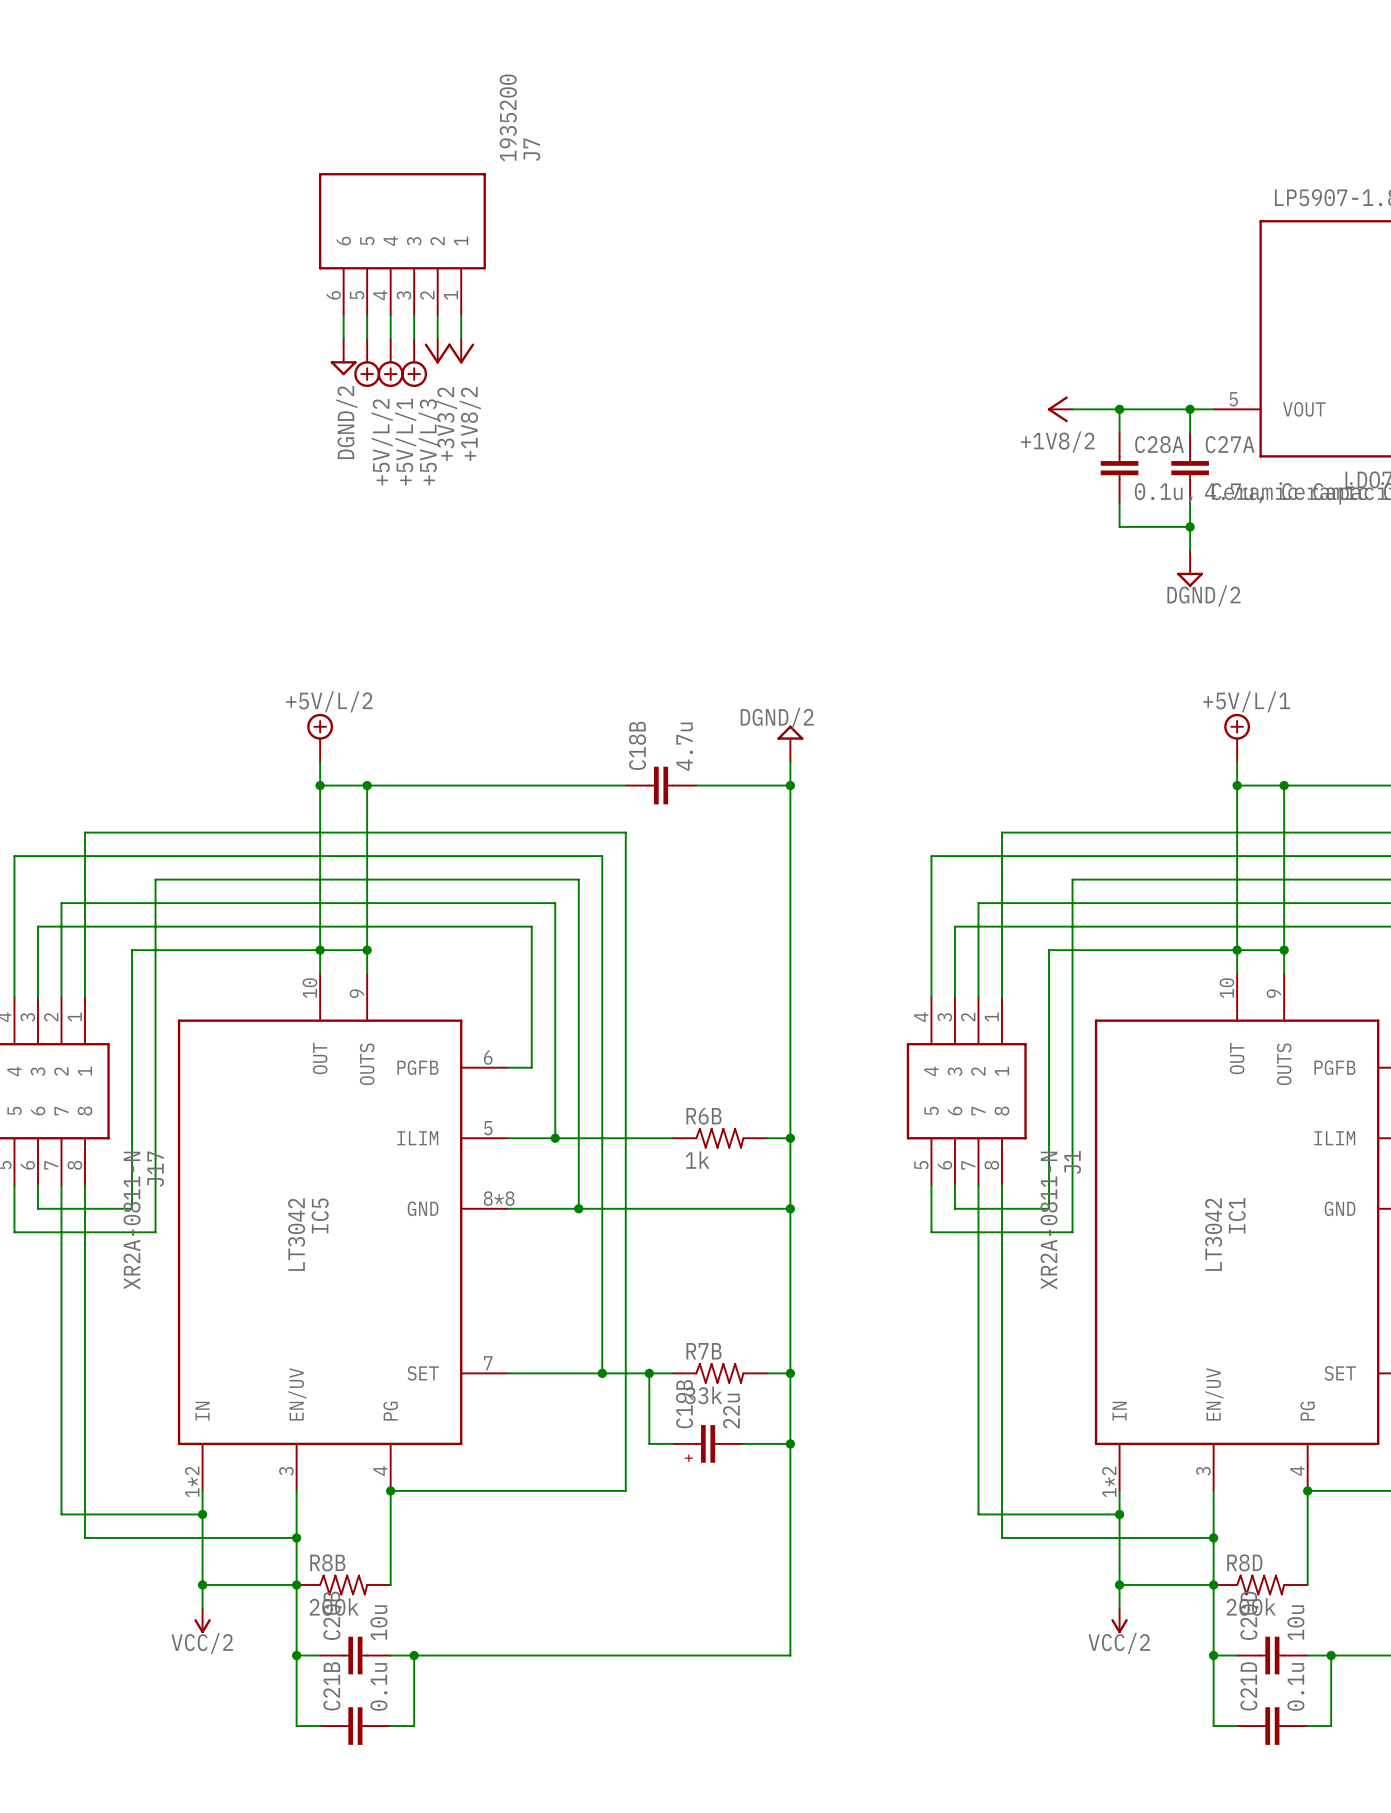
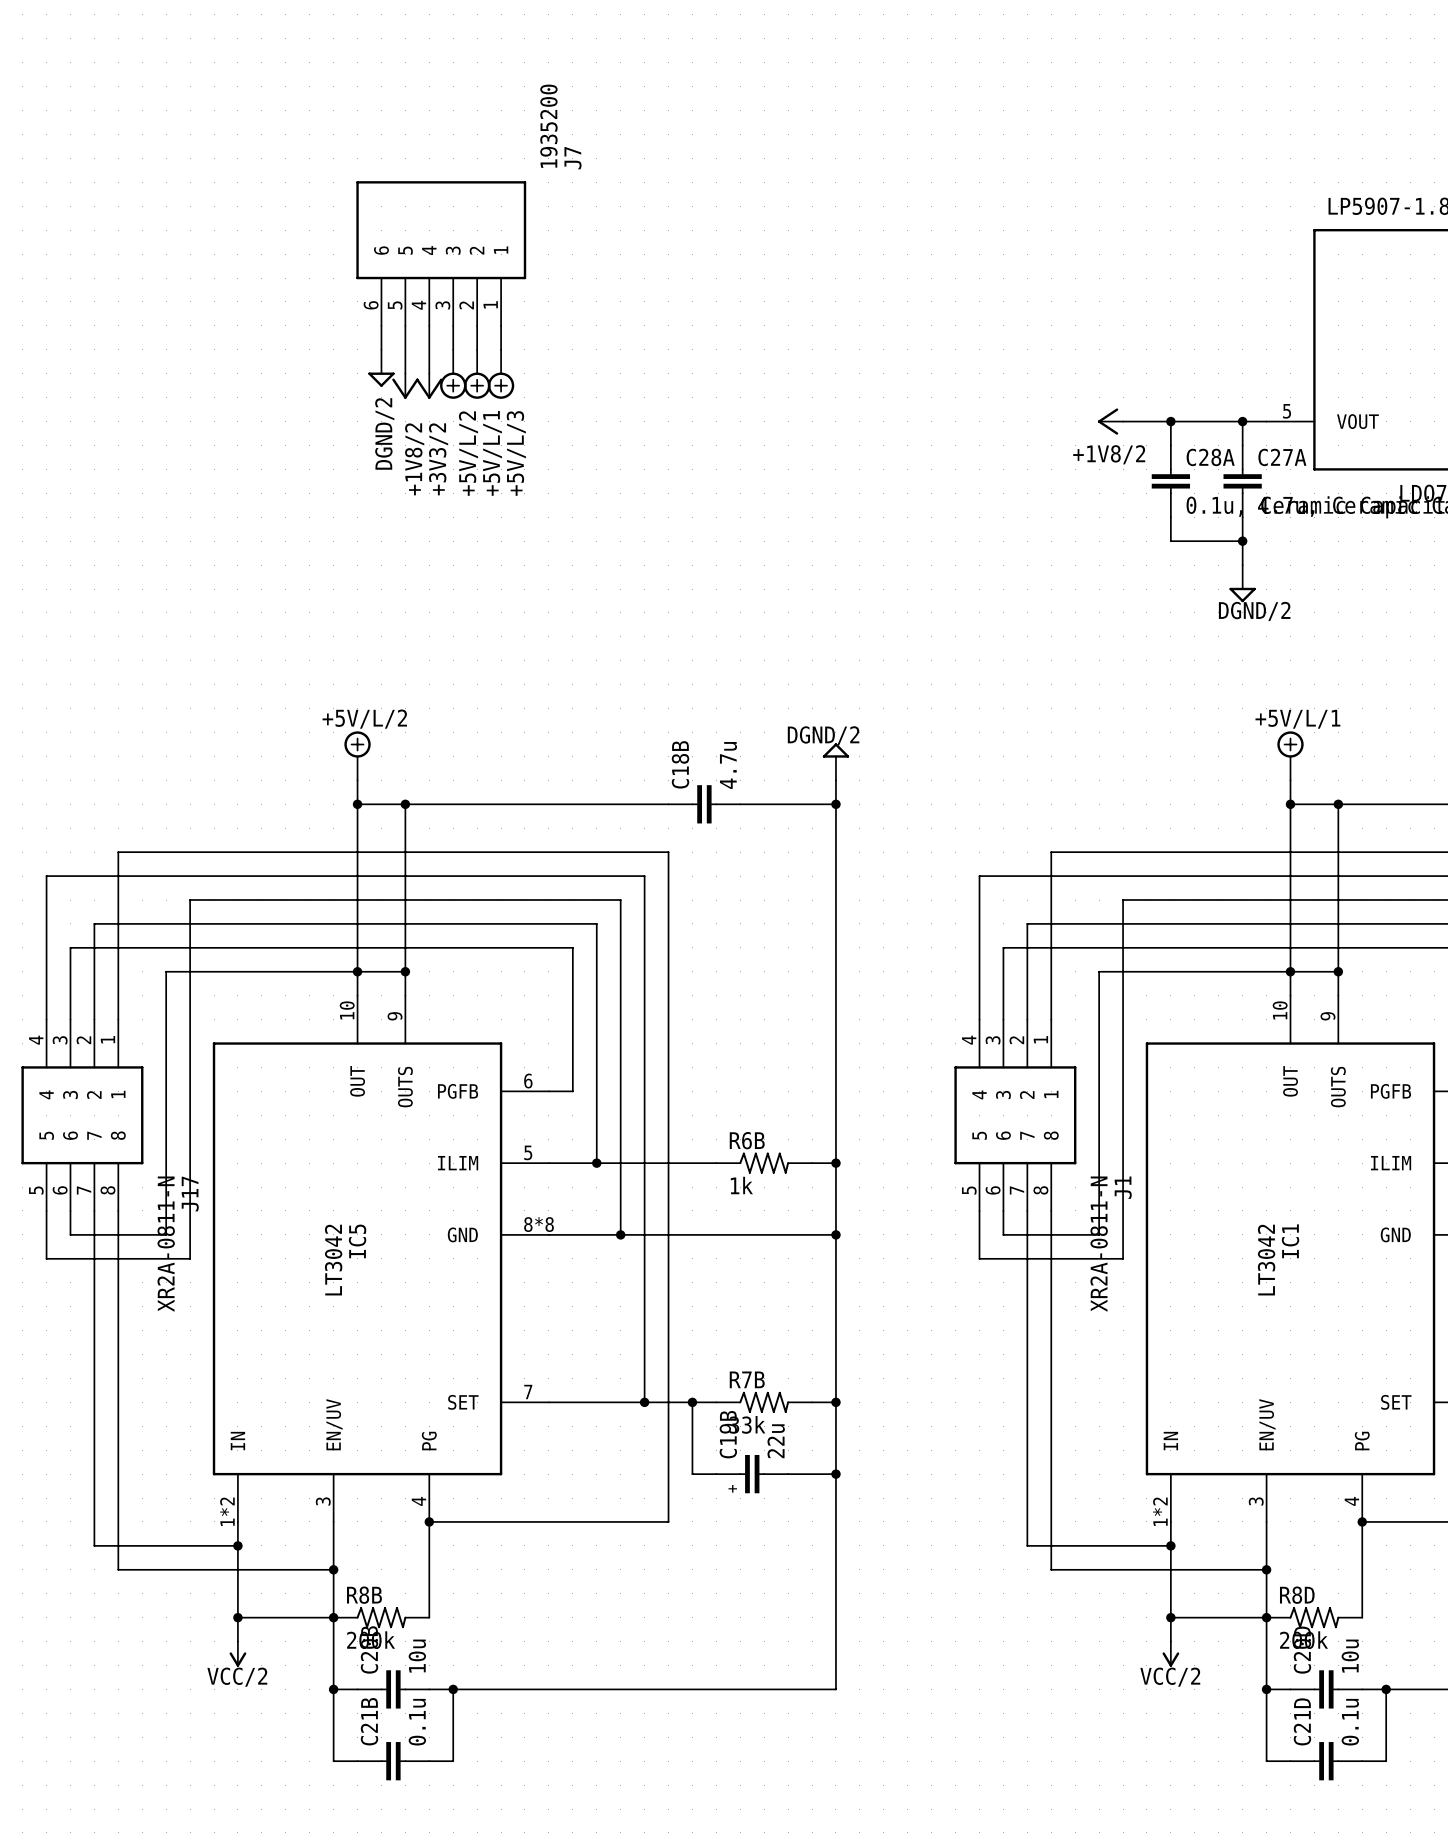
power symbol position: +3V3/2 (437, 351) -> +3V3/2 (429, 386)
power symbol position: +1V8/2 (461, 351) -> +1V8/2 (405, 386)
power symbol: +5V/L/2 (367, 362) -> none
power symbol position: +5V/L/1 (390, 362) -> +5V/L/1 (477, 374)
power symbol: +5V/L/3 (414, 362) -> +5V/L/2 (453, 374)
power symbol: none -> +5V/L/3 (501, 374)

